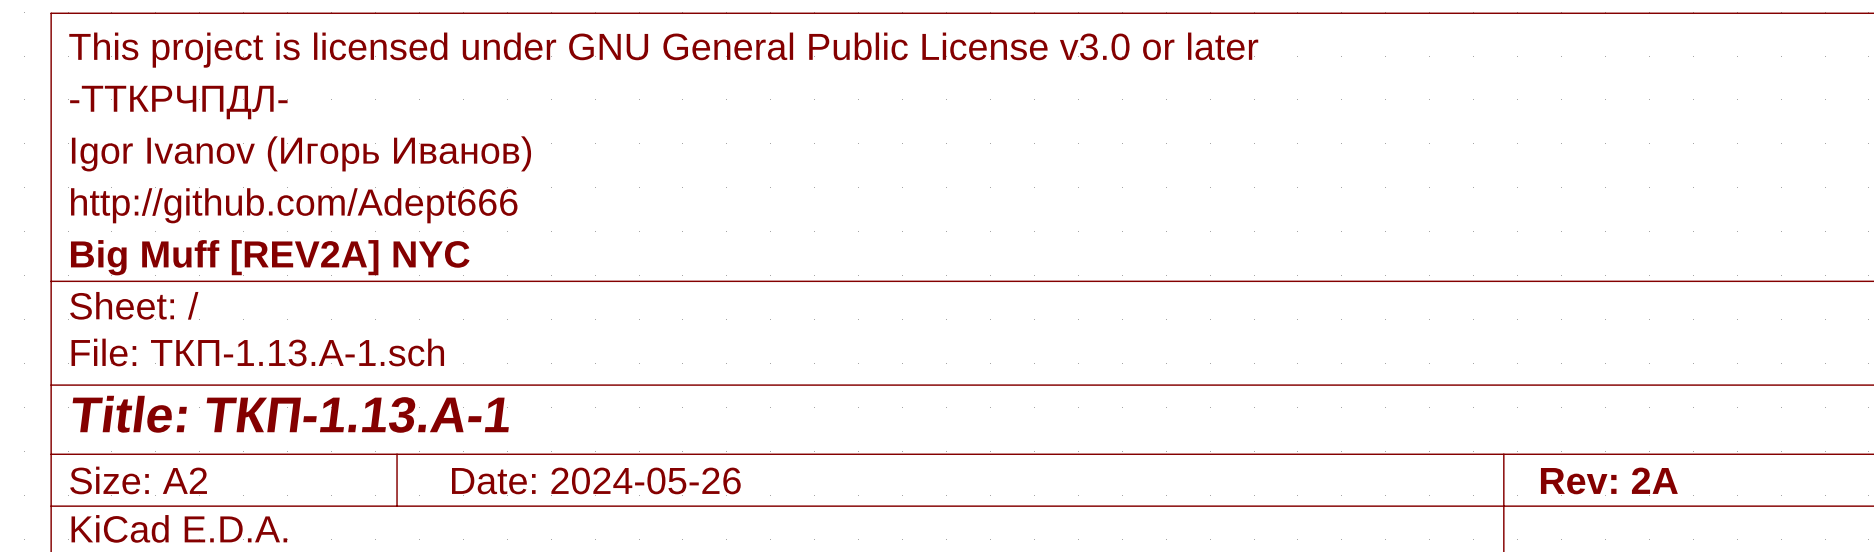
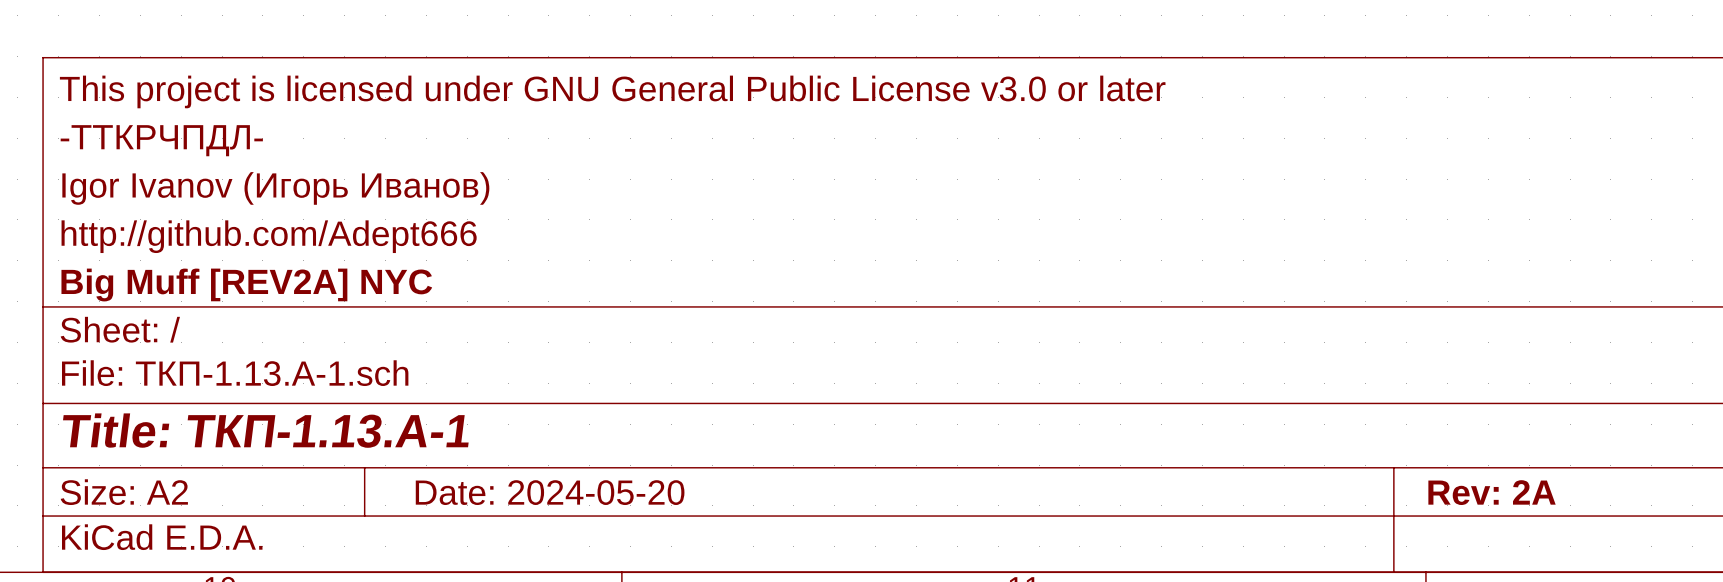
title block: Date: 2024-05-26 (596, 480) -> Date: 2024-05-20 (550, 492)

